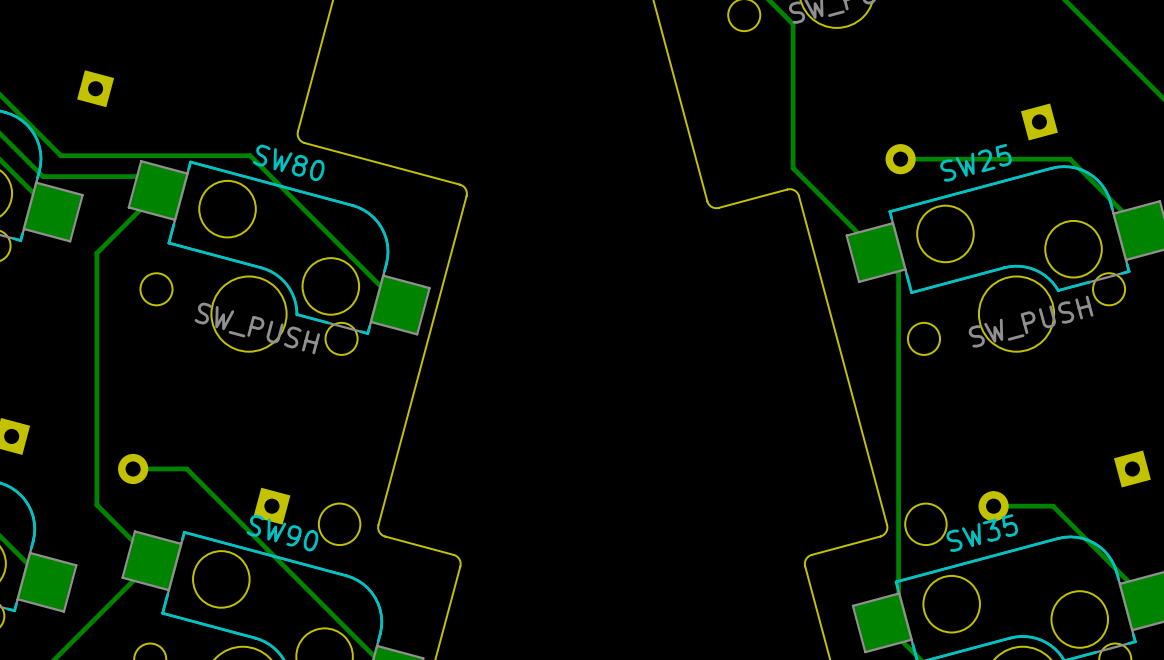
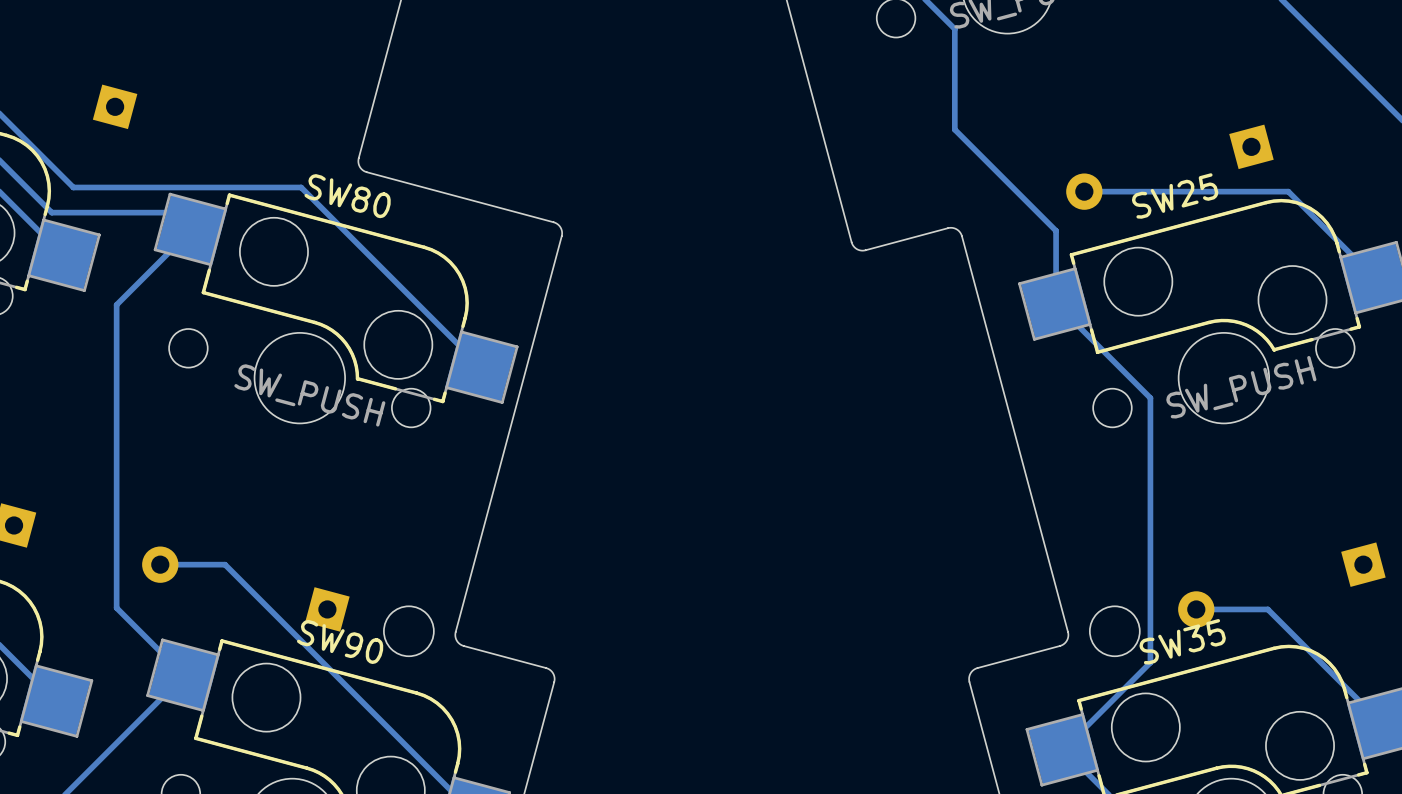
track: (793, 107) (793, 168) (877, 252) -> (954, 129) (1056, 230) (1056, 303)
track: (898, 273) (898, 607) -> (1081, 329) (1150, 398) (1150, 662) (1081, 731)

